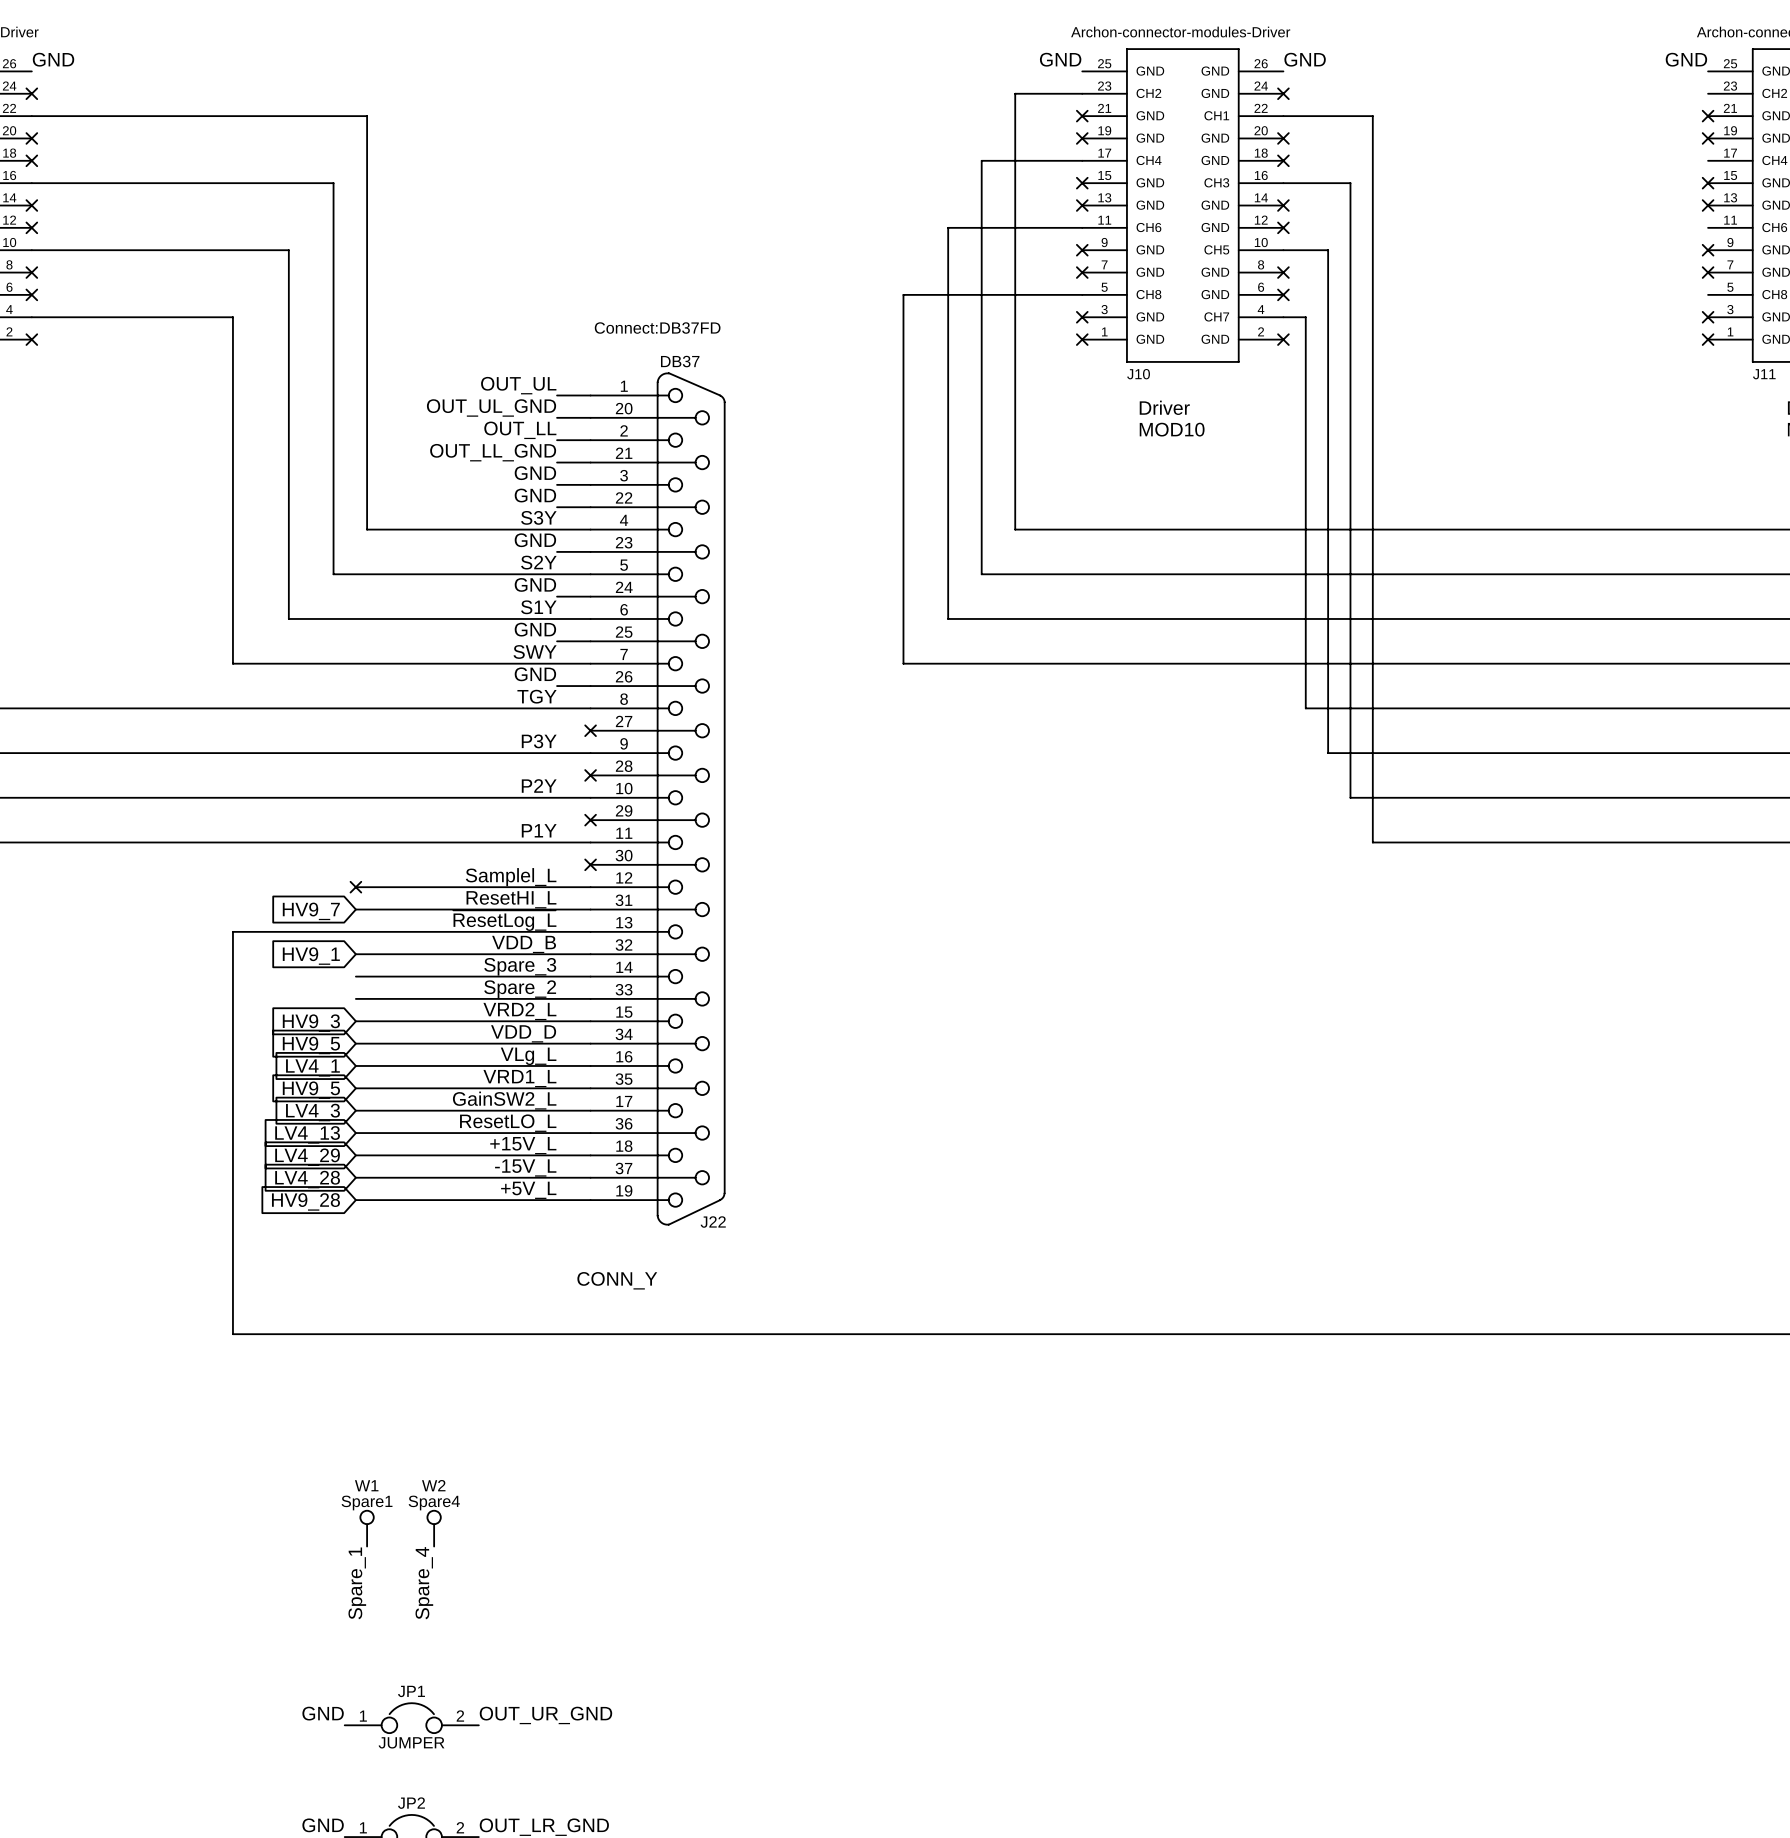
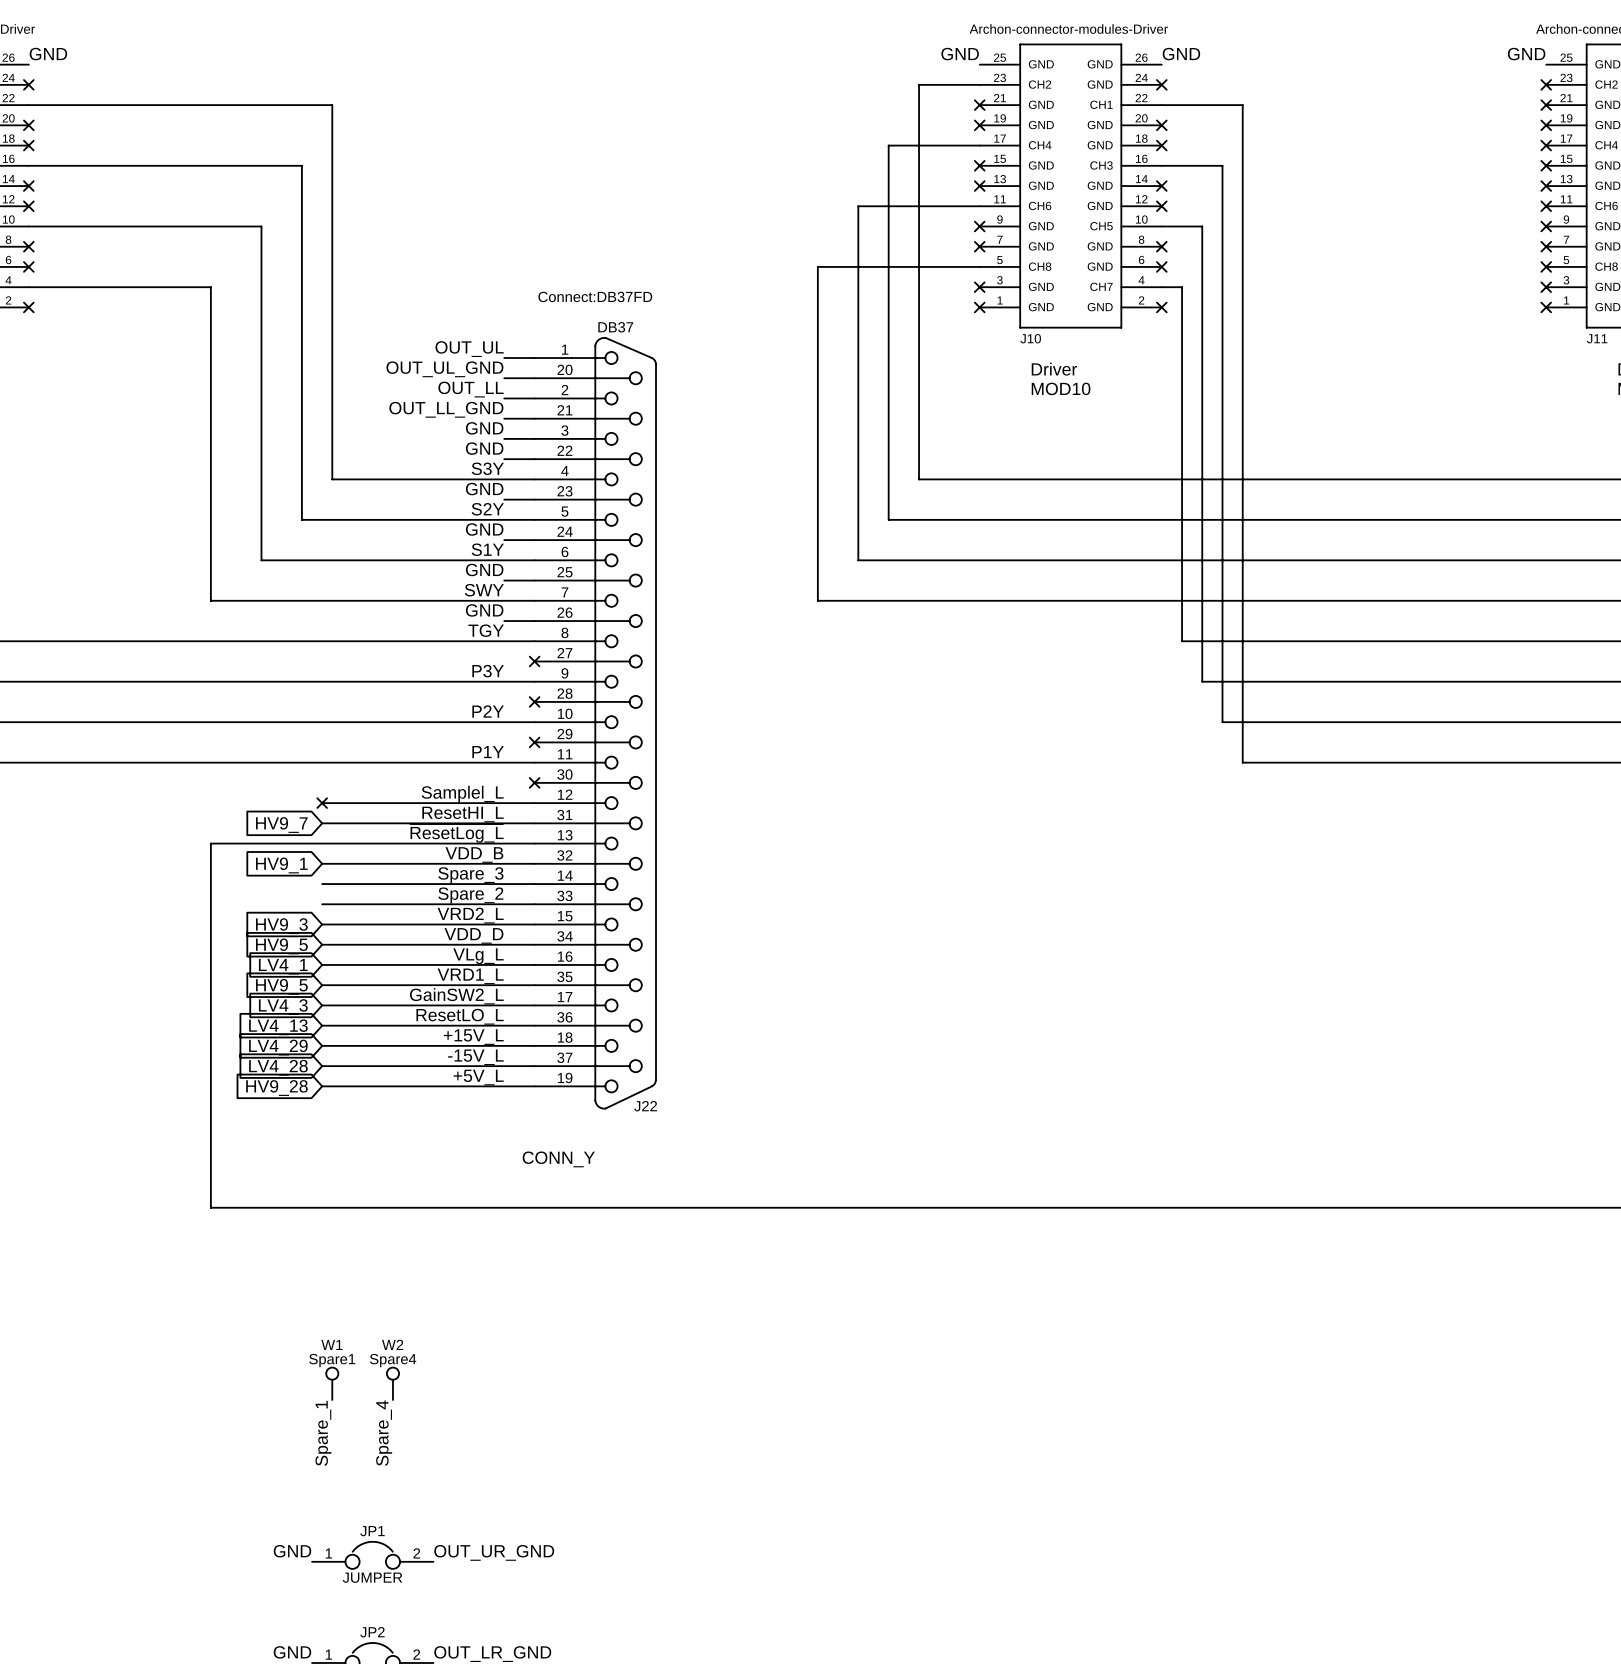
no-connect mark: none -> (1546, 84)
no-connect mark: none -> (1546, 145)
no-connect mark: none -> (1546, 206)
no-connect mark: none -> (1546, 266)

